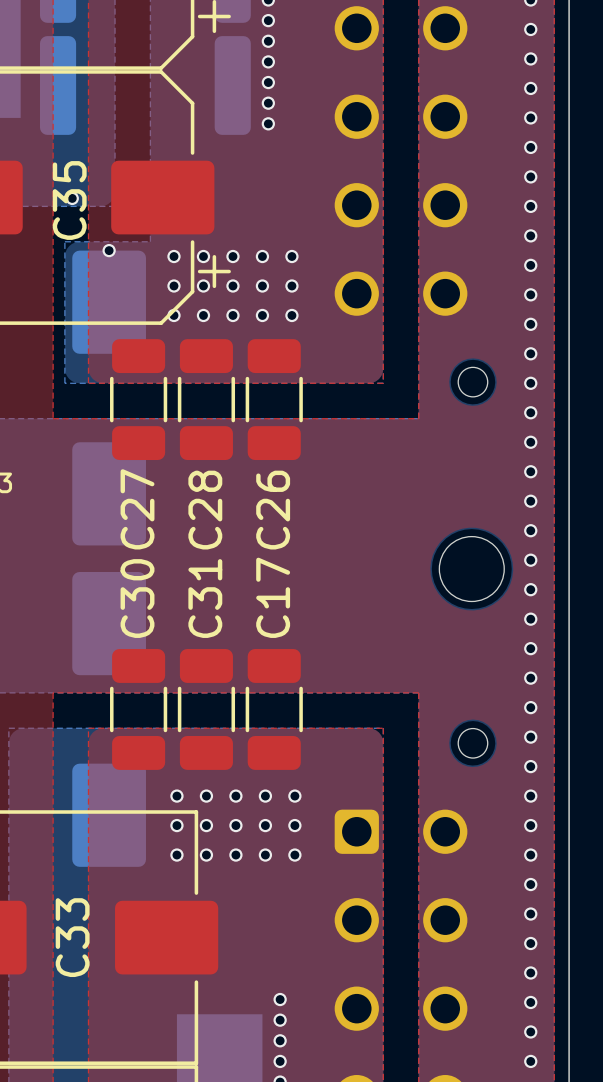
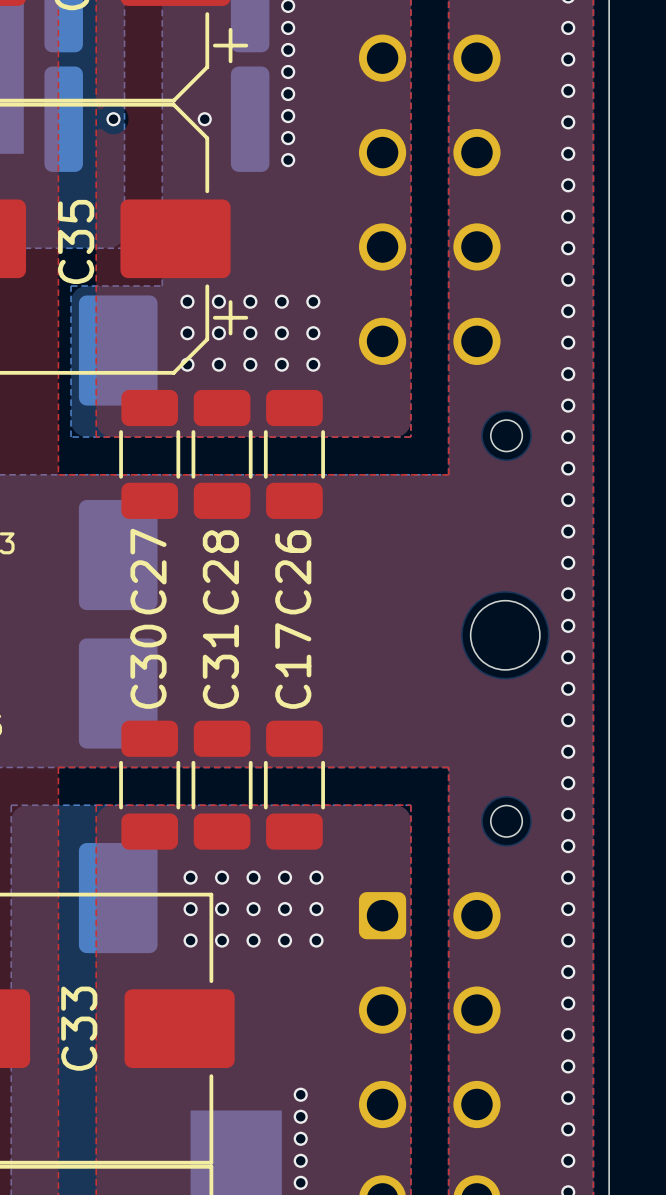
via: none -> (113, 119)
via: none -> (204, 119)
via: (72, 198) -> none
via: (109, 250) -> none

